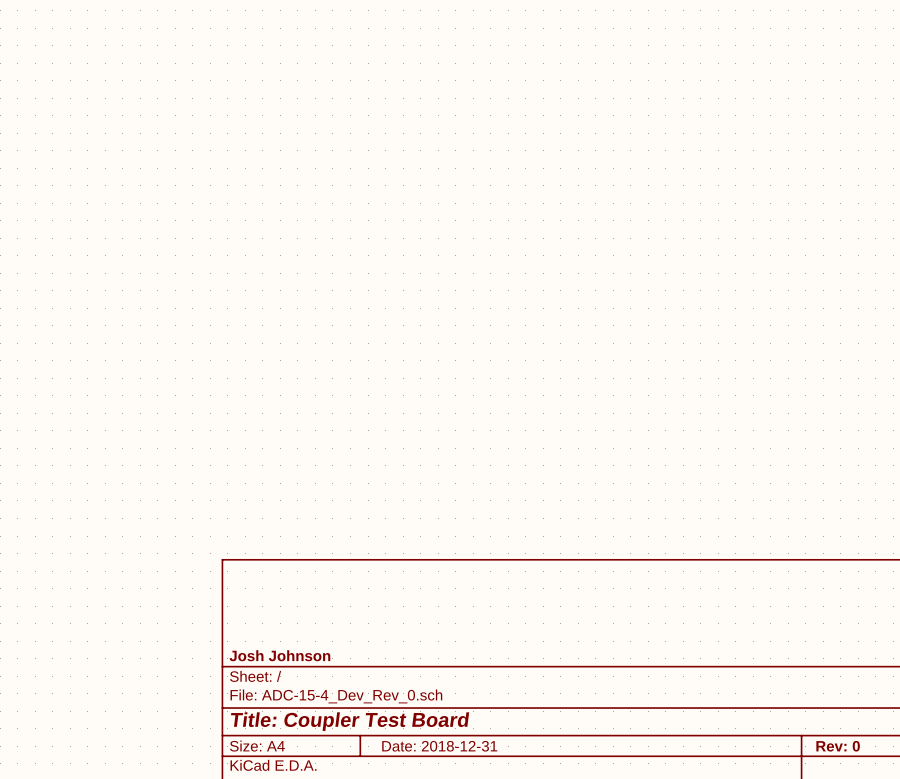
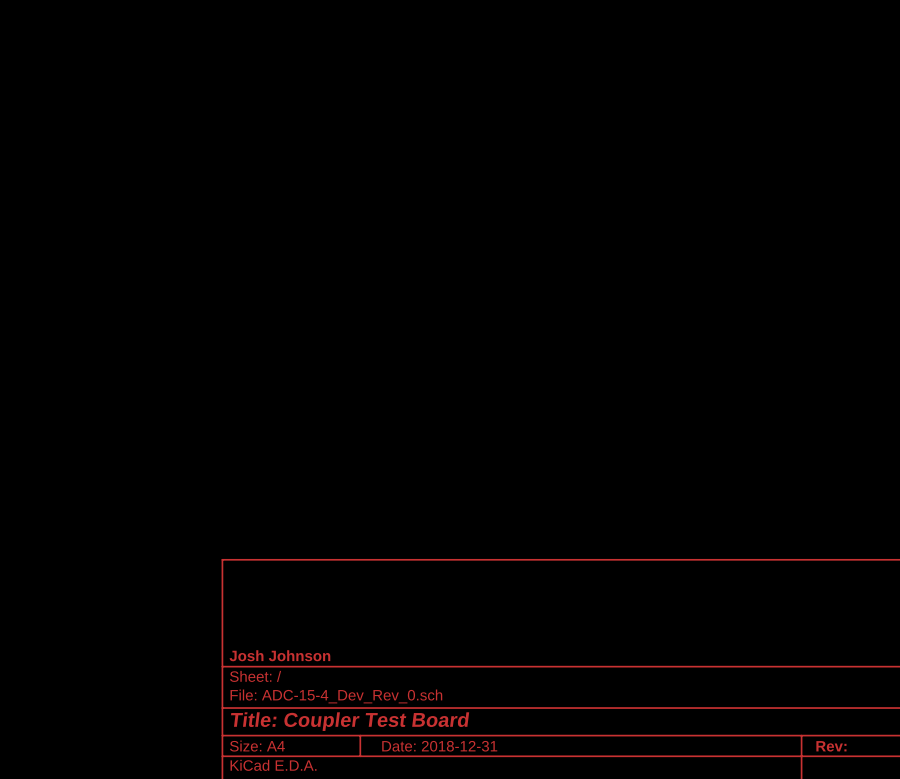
title block: Rev: 0 (838, 746) -> Rev: (831, 746)

